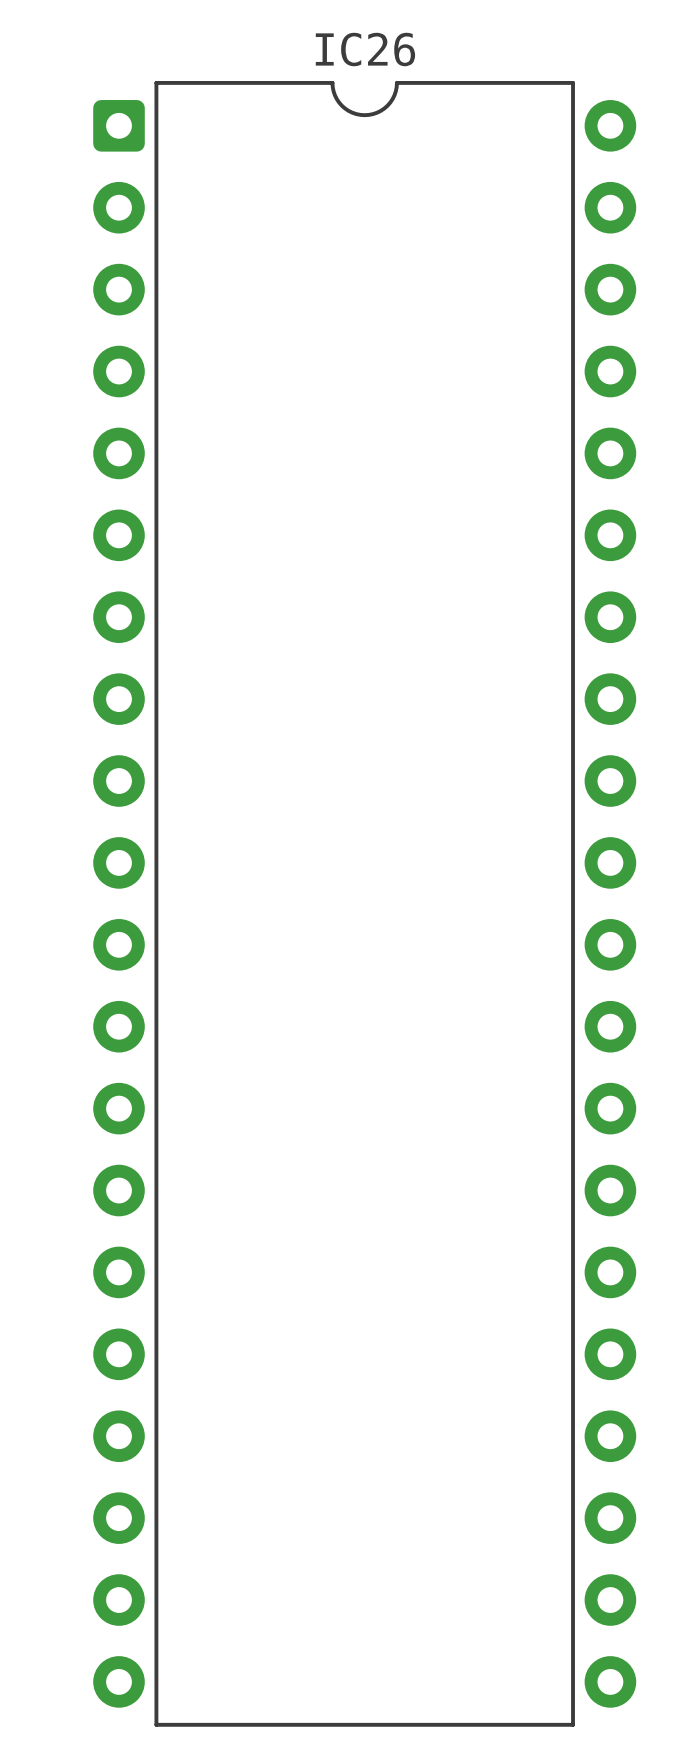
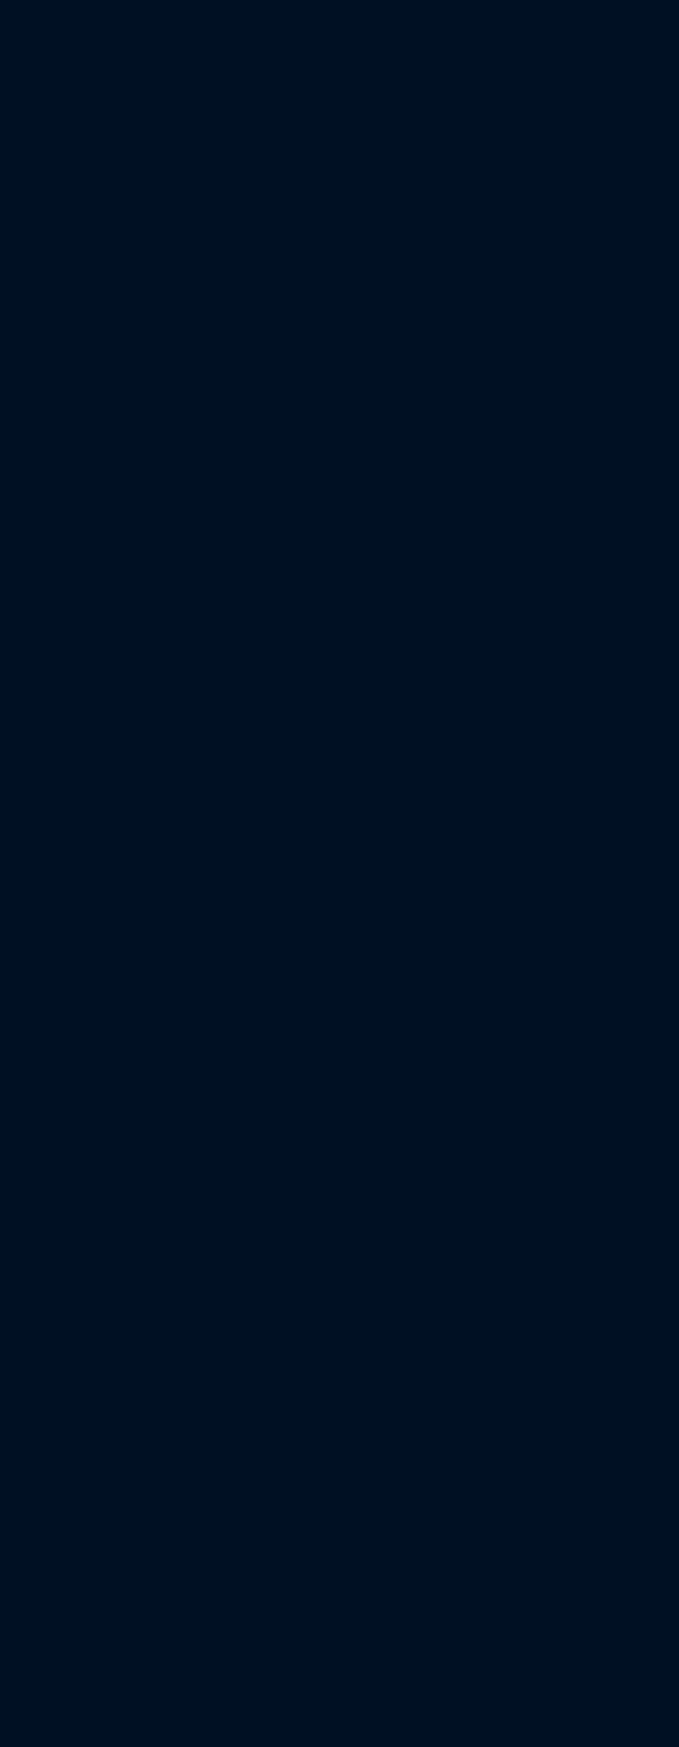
IC26: (364, 903) -> none

